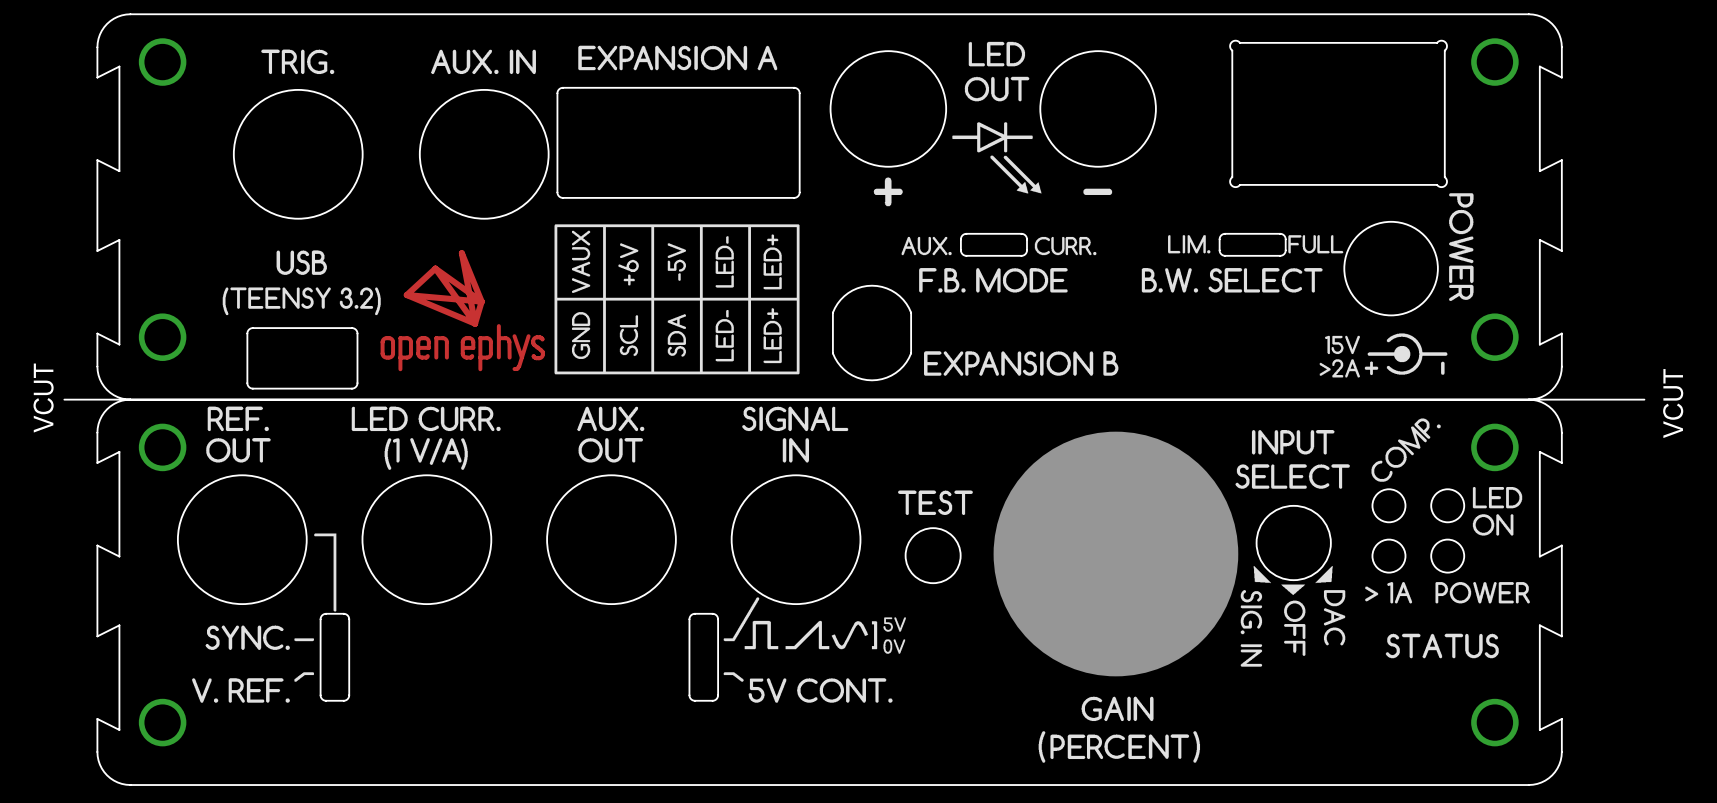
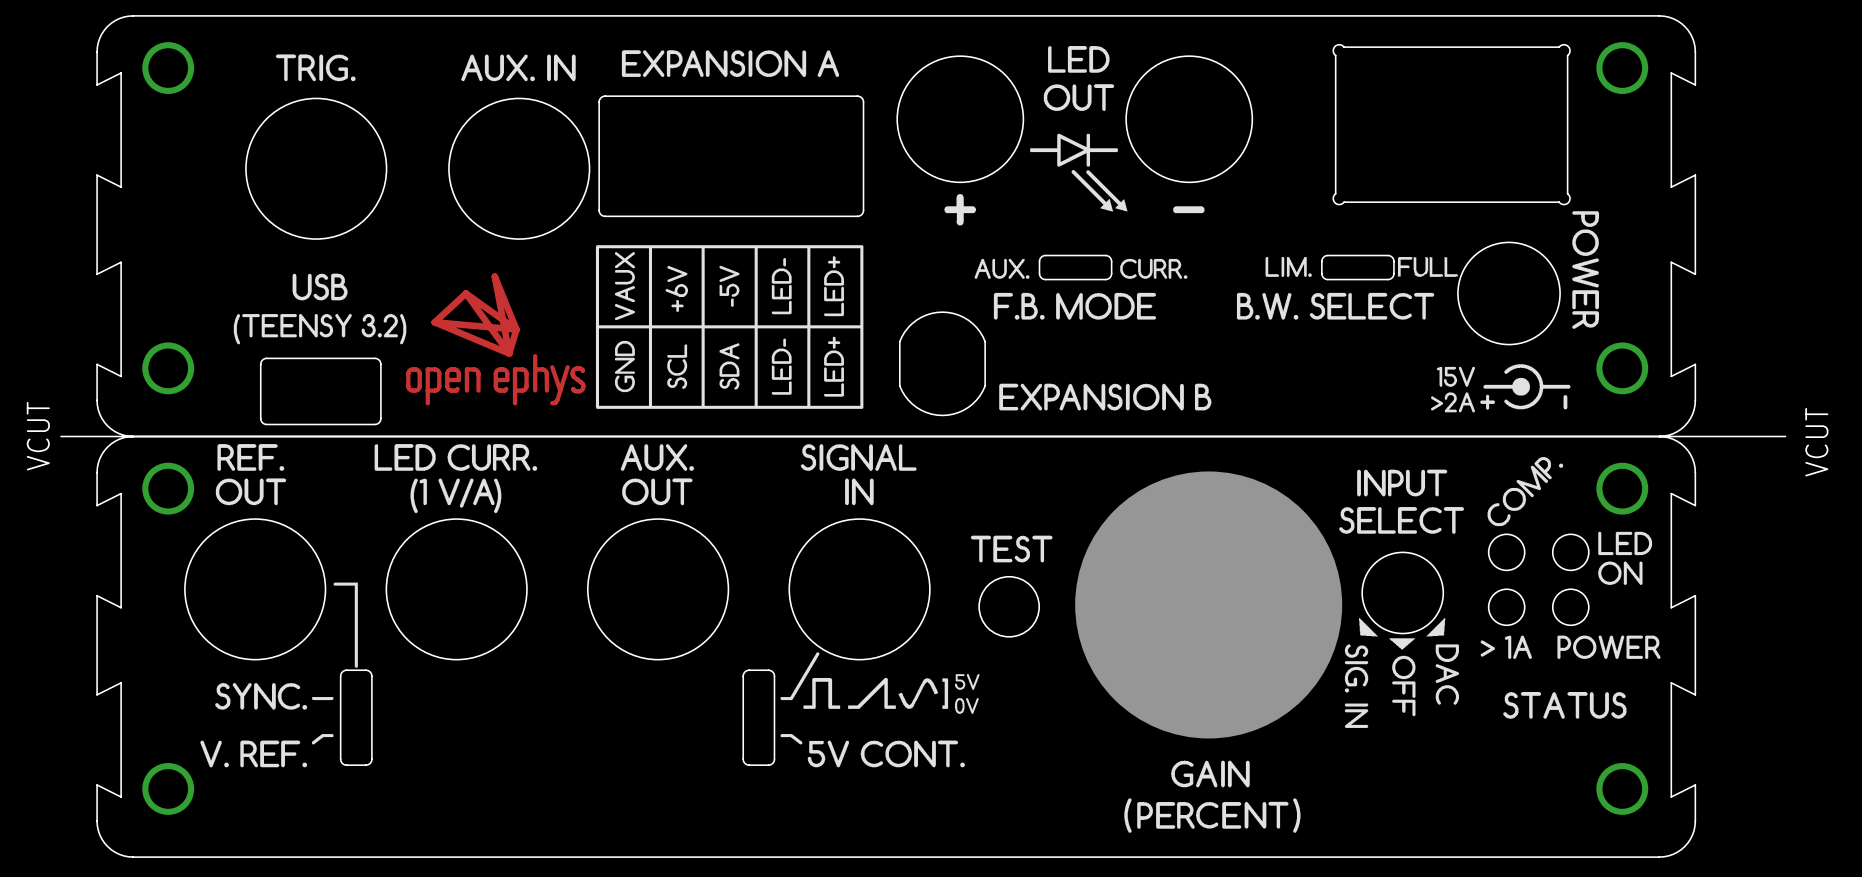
drawing: [1288, 235, 1344, 254] -> none
drawing: none -> [1397, 257, 1458, 277]

